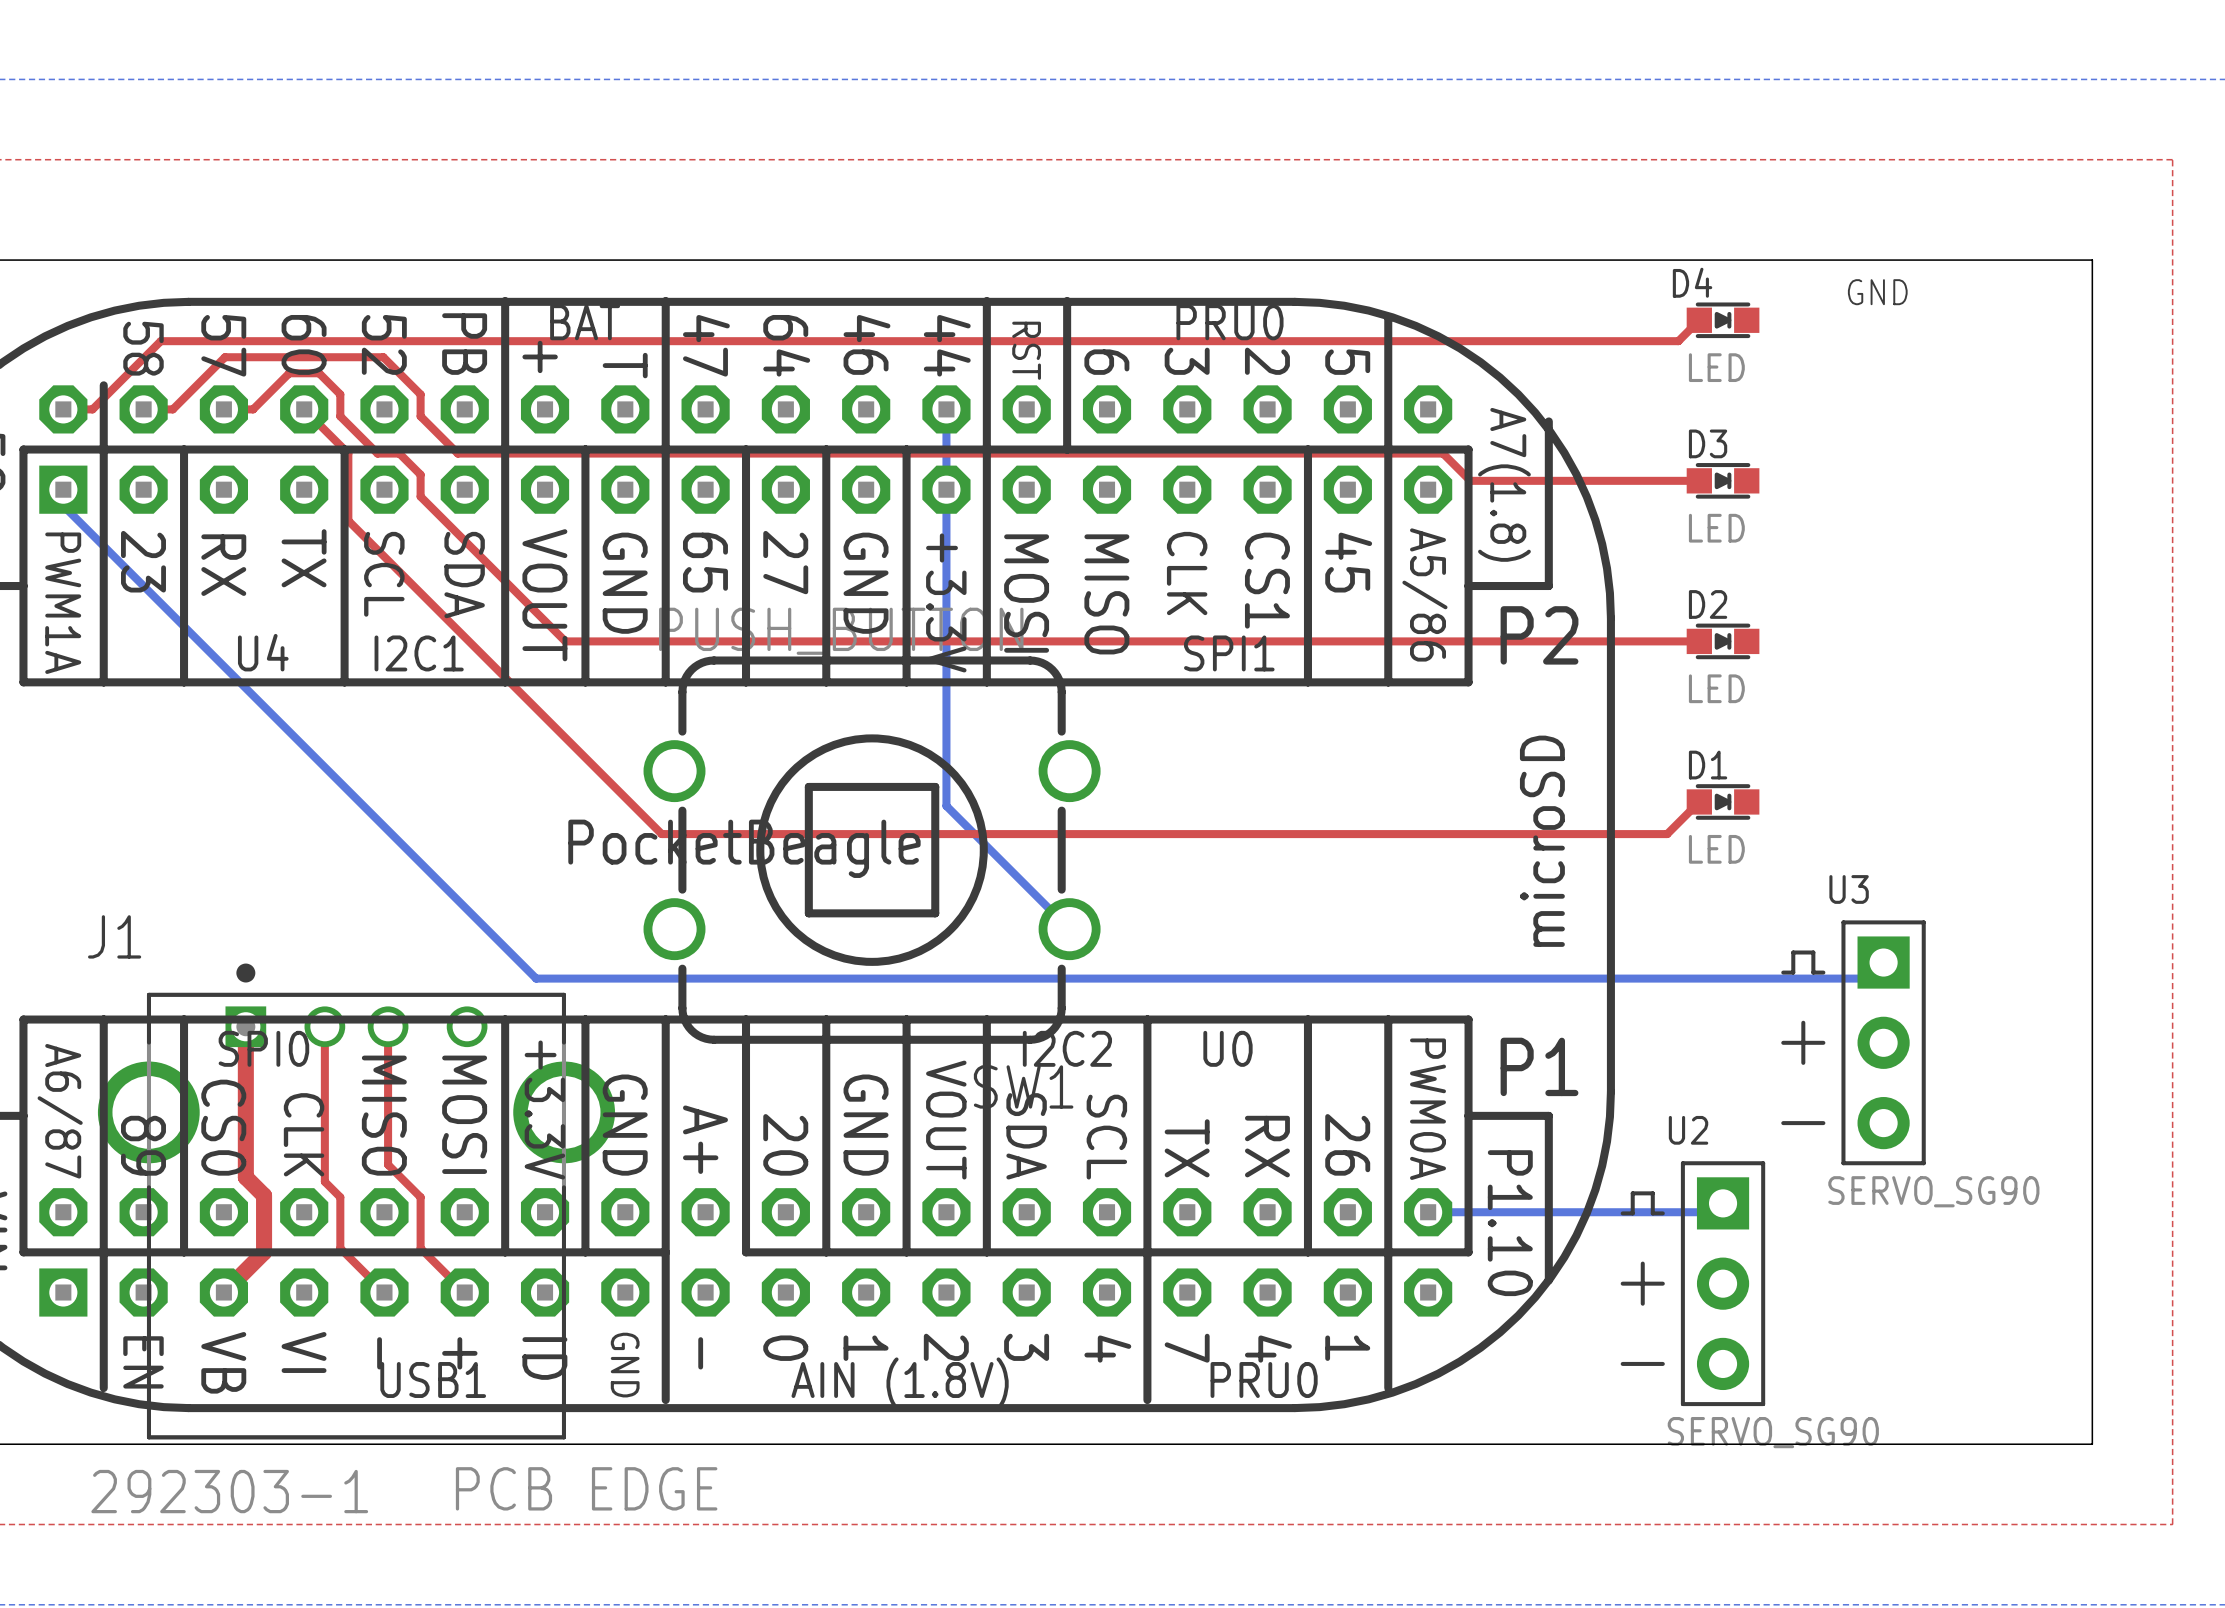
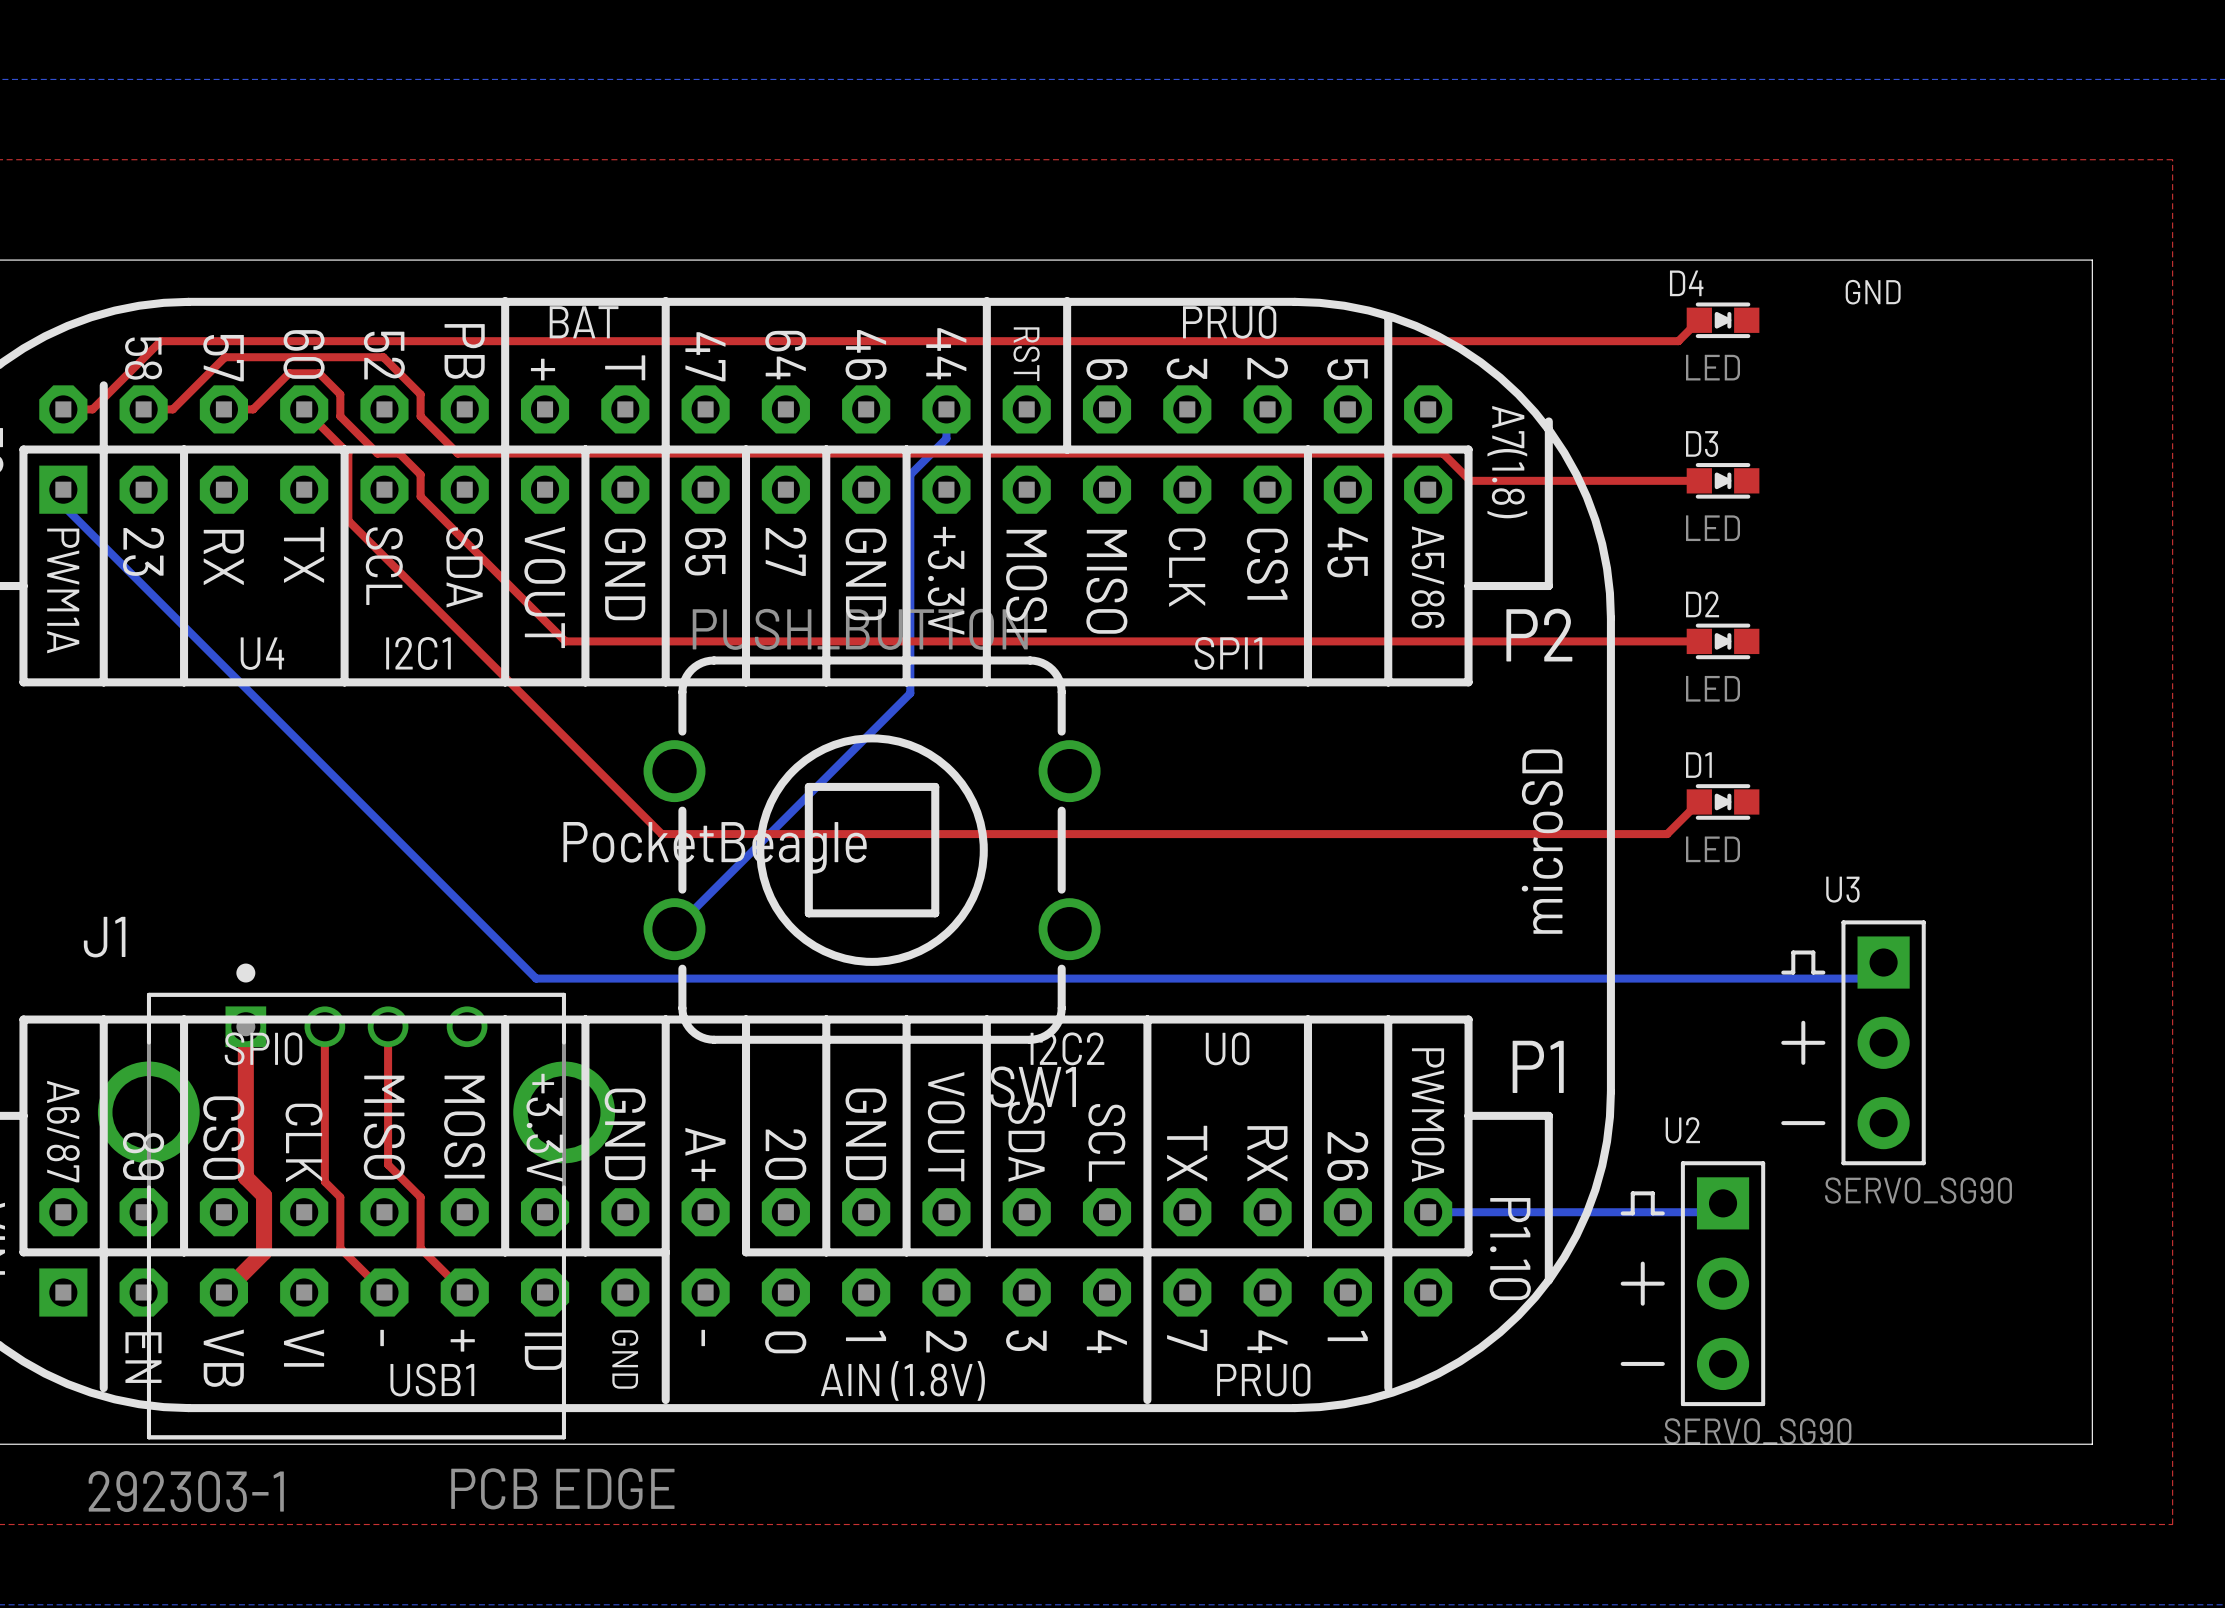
bottom track: (946, 438) (946, 806) (1069, 929) -> (946, 438) (910, 474) (910, 693) (674, 929)

